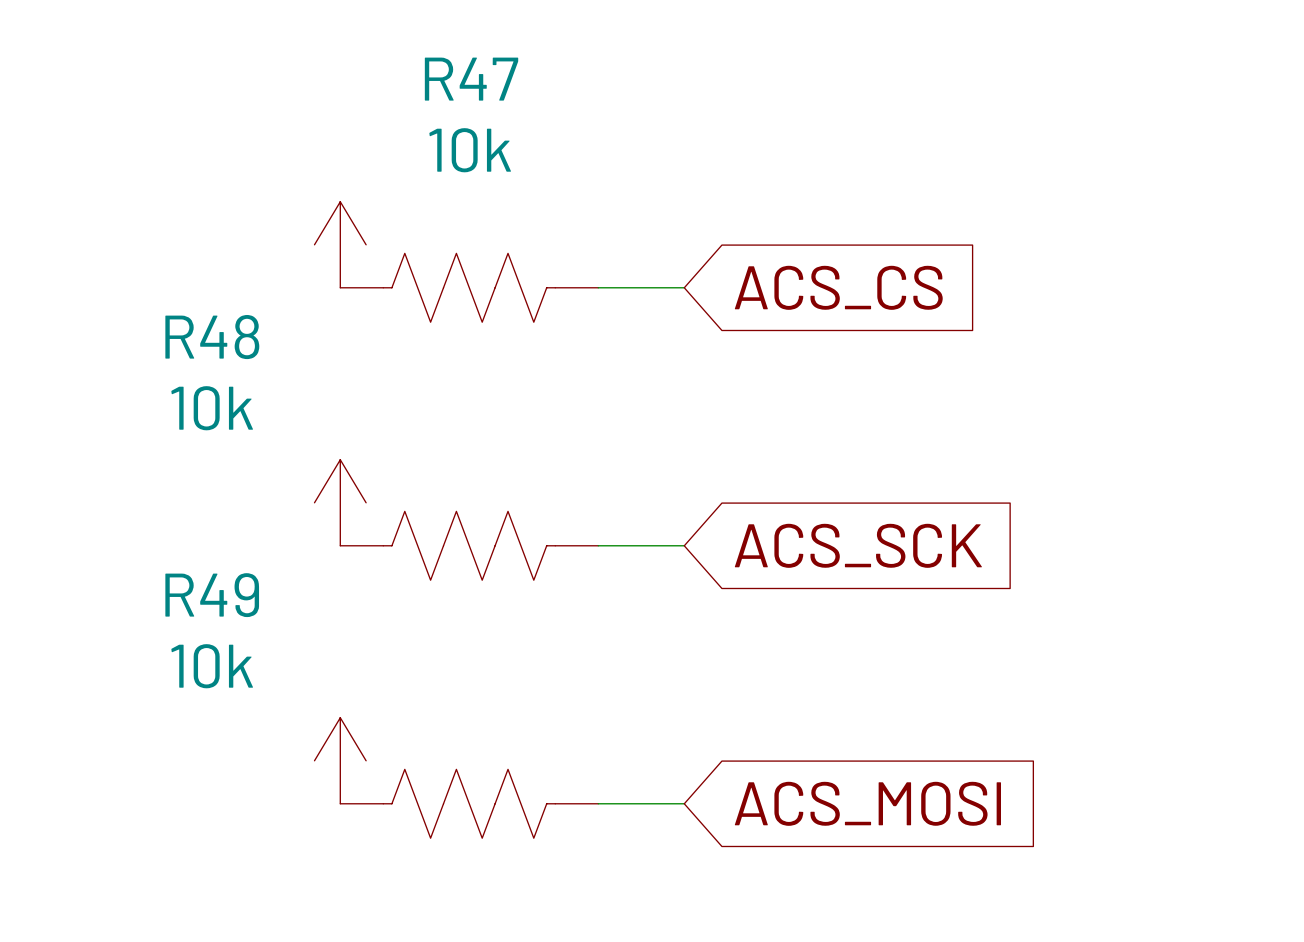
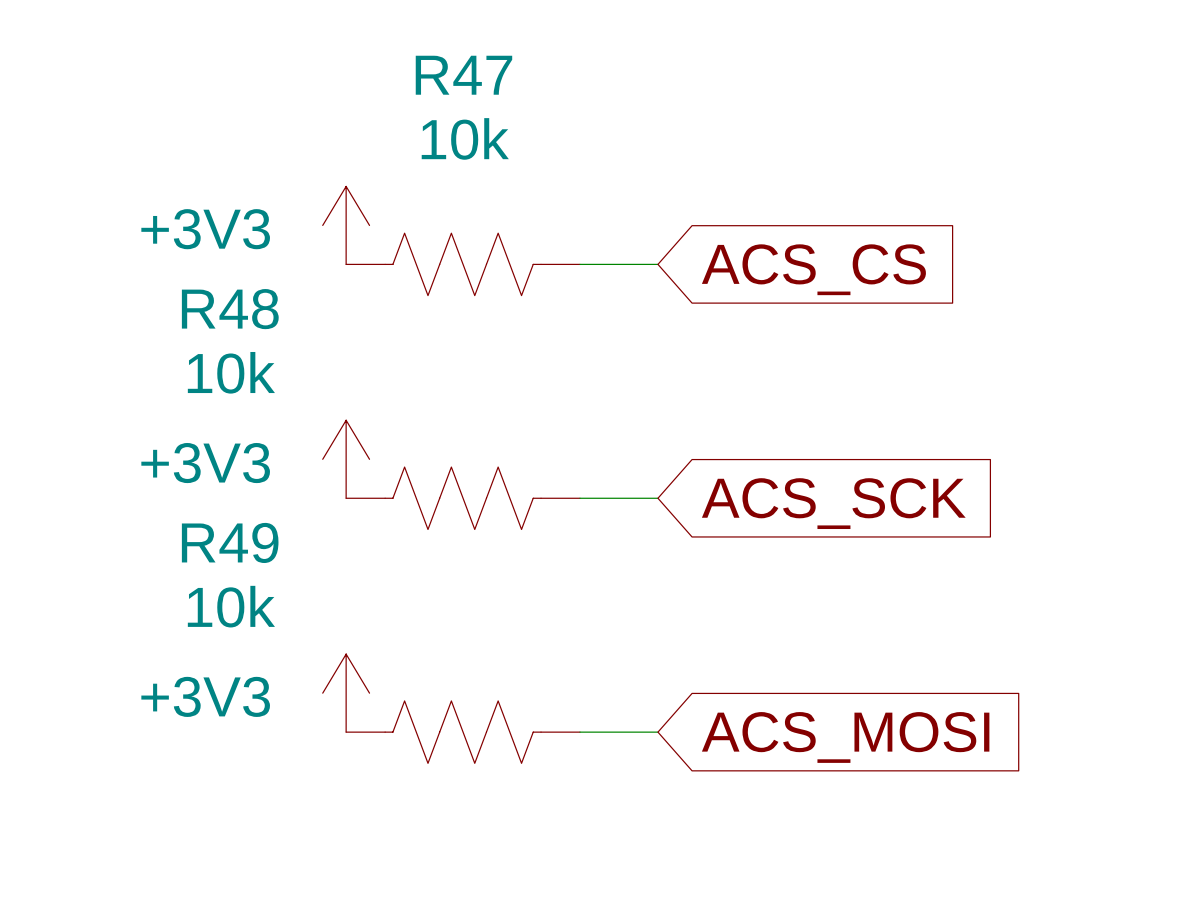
power symbol text: none -> +3V3 (205, 229)
power symbol text: none -> +3V3 (205, 463)
power symbol text: none -> +3V3 (205, 696)

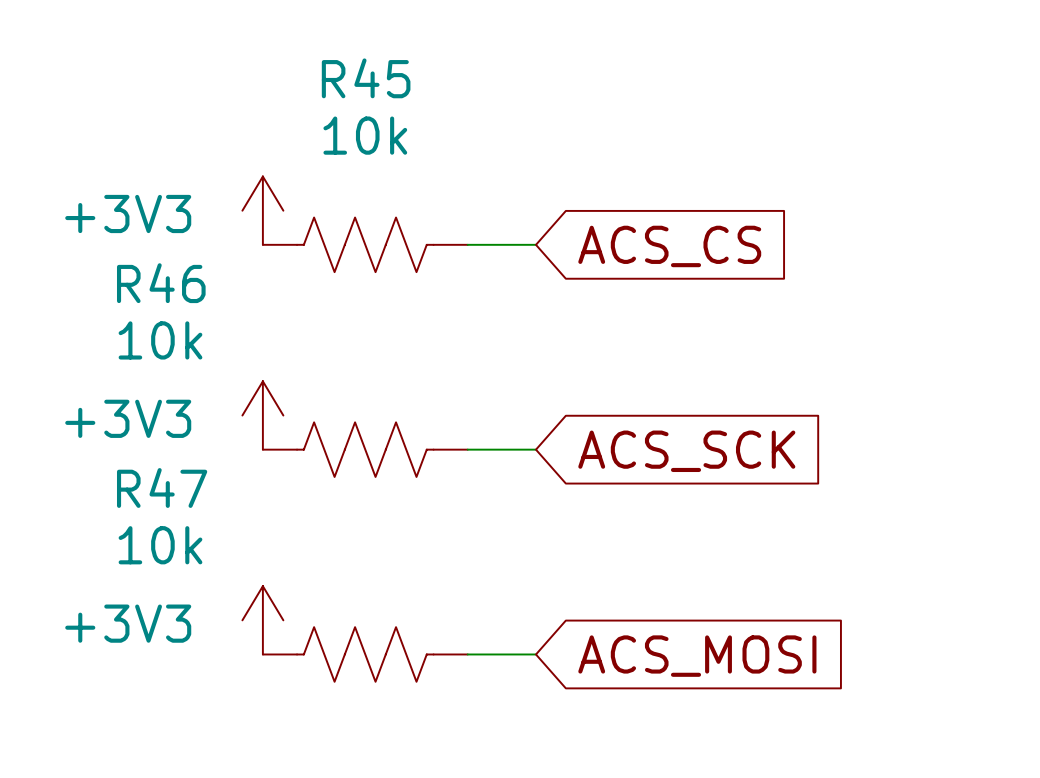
R47 name: R47 (463, 75) -> R45 (366, 78)
R48 name: R48 (230, 309) -> R46 (161, 283)
R49 name: R49 (230, 542) -> R47 (162, 487)

